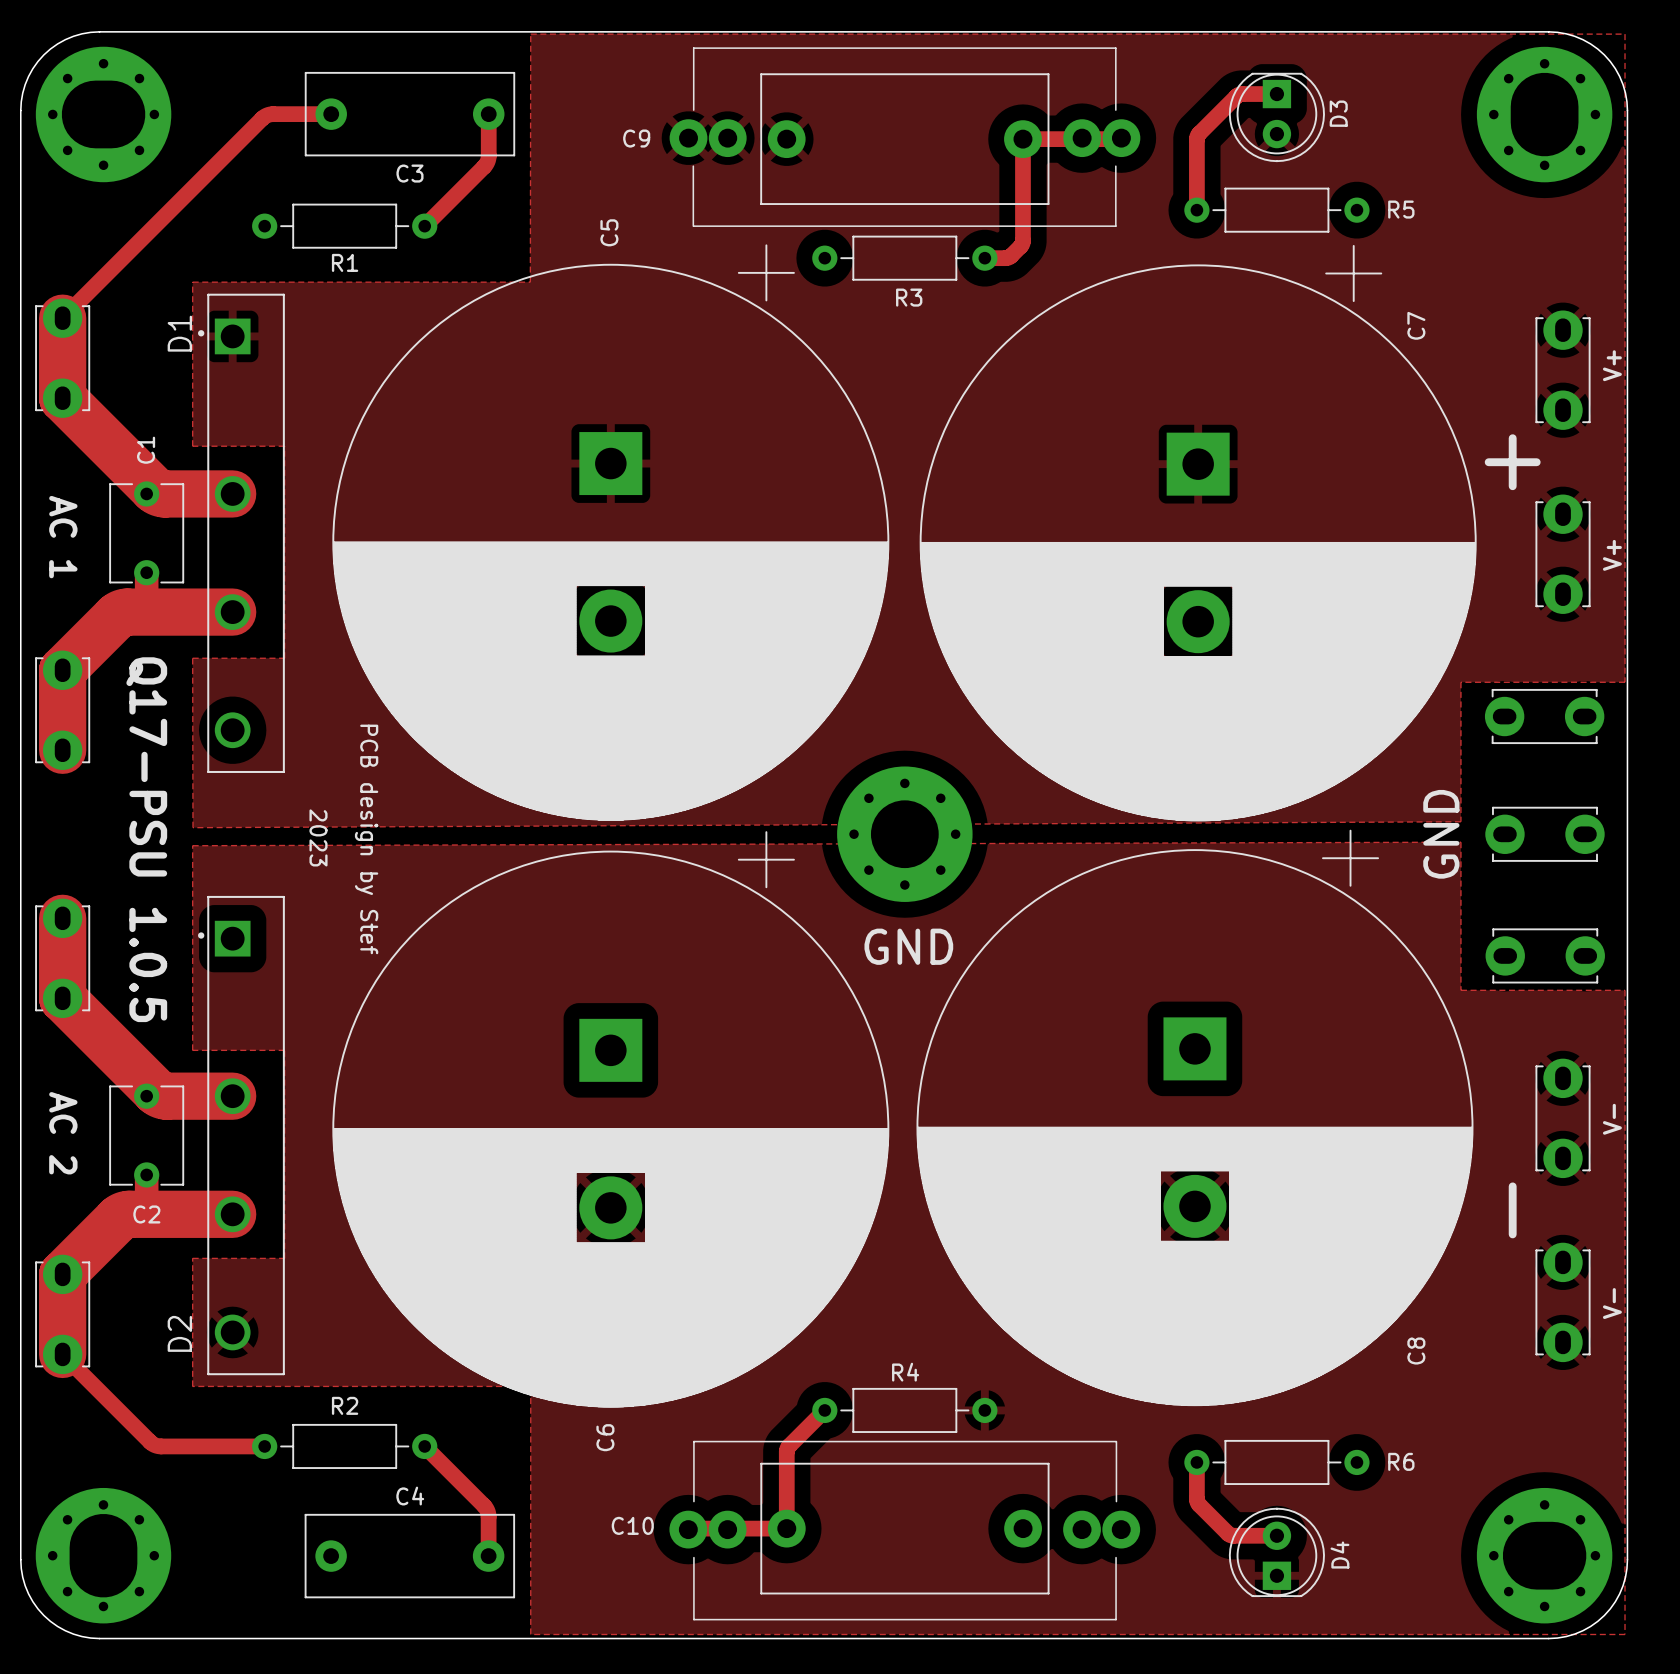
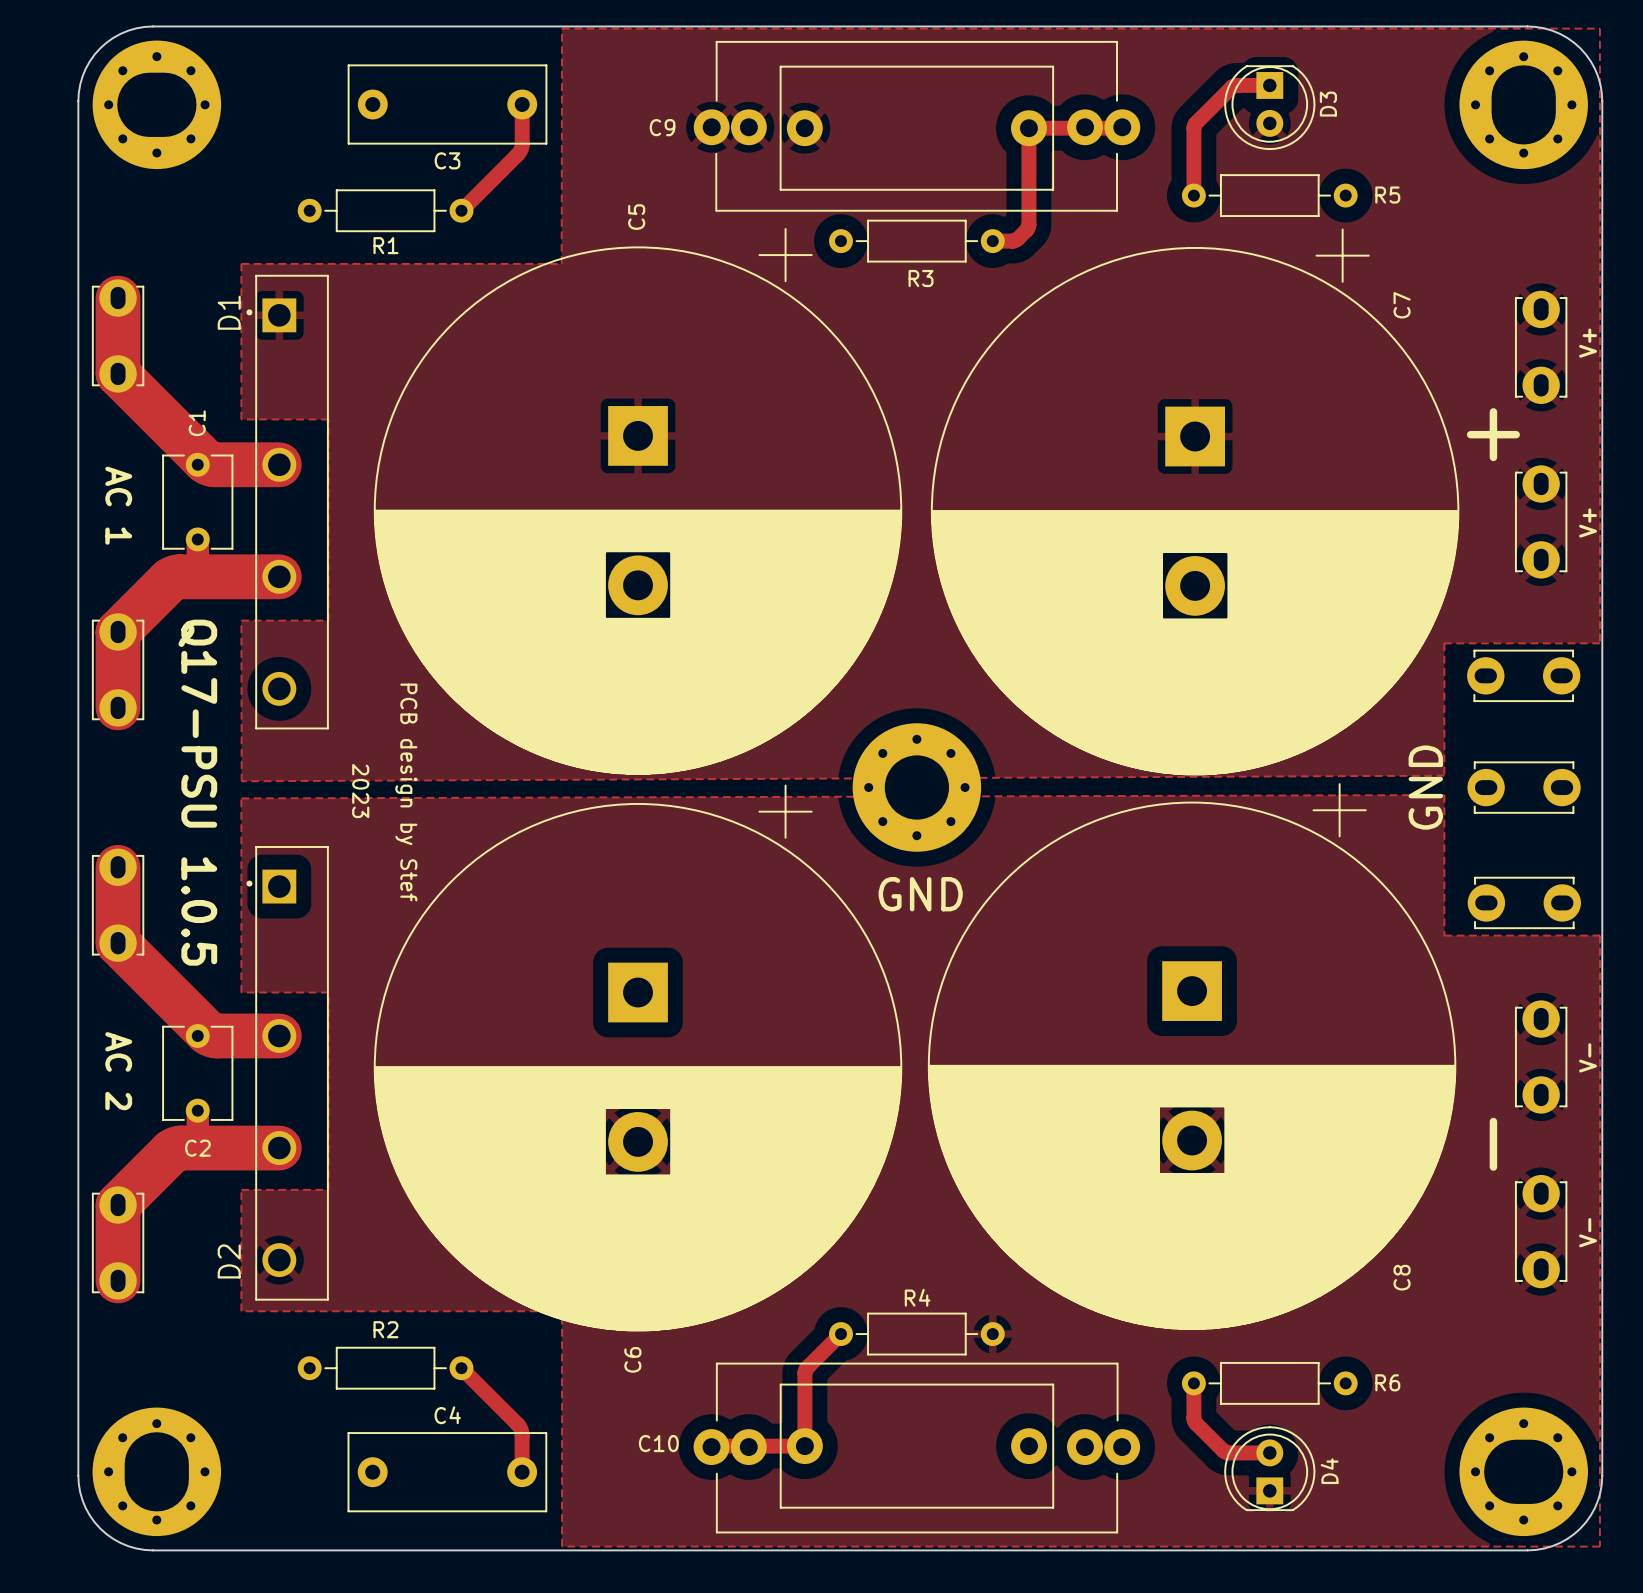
track: (331, 114) (271, 114) (263, 117) (62, 318) -> none
track: (62, 1354) (155, 1445) (264, 1446) -> none

